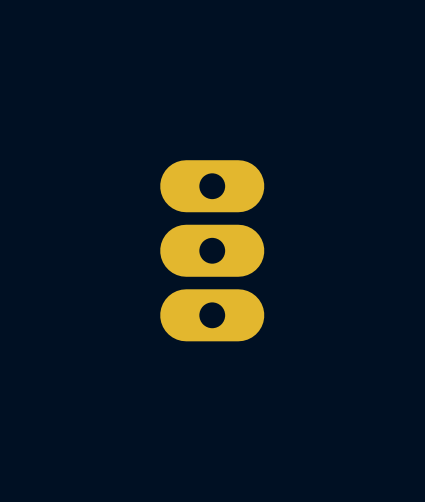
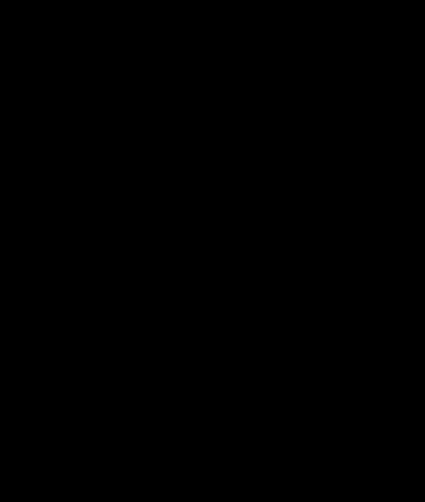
part: (212, 250) -> none

